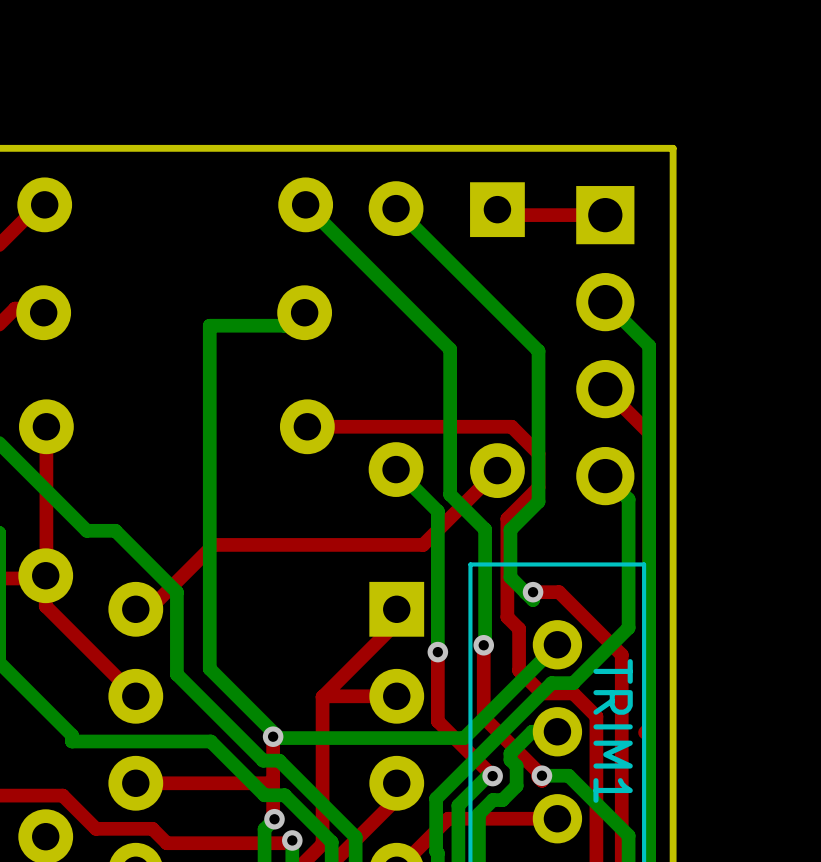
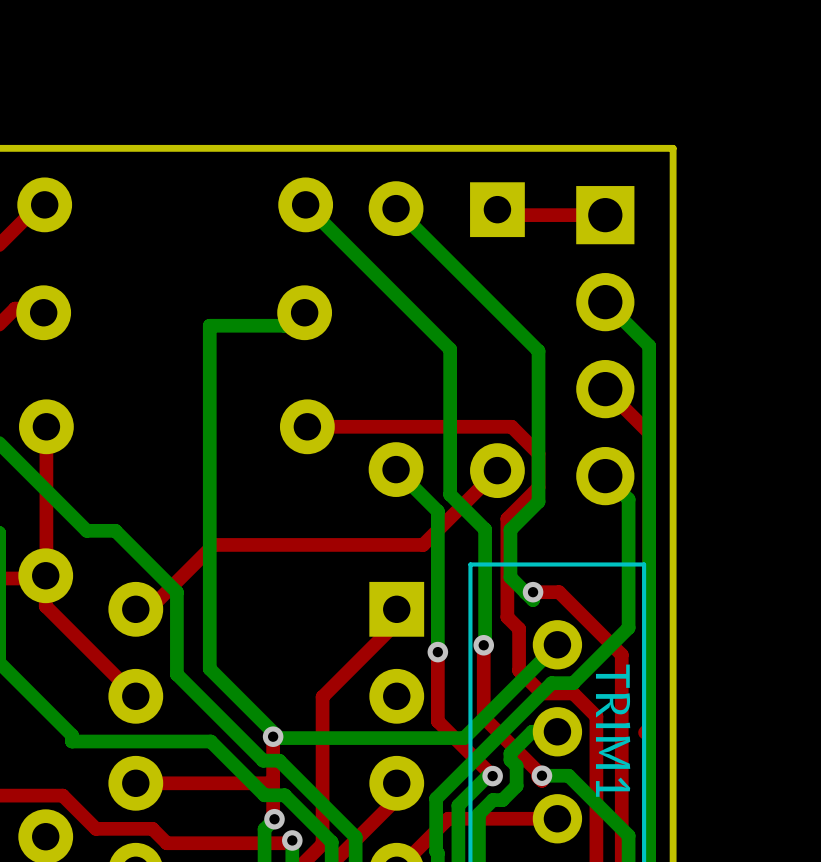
top track: (396, 696) (323, 696) -> none

